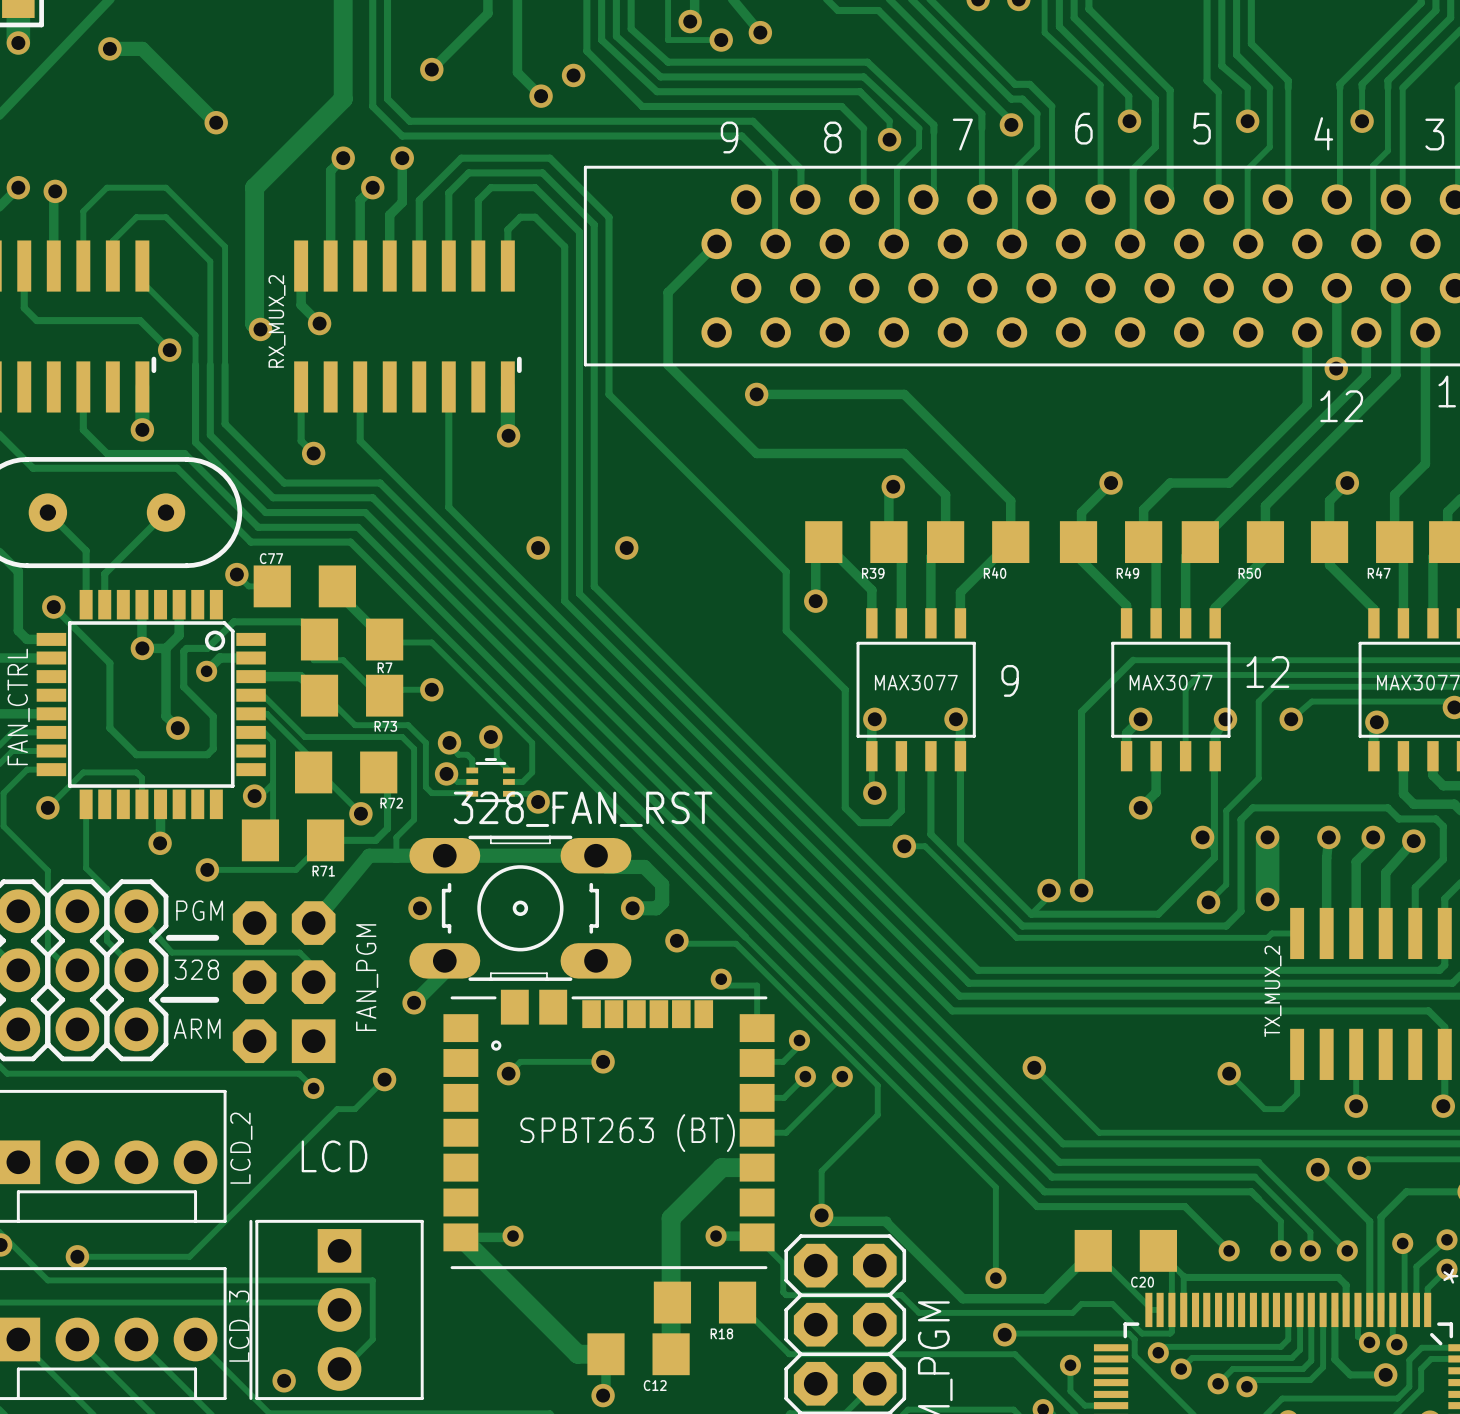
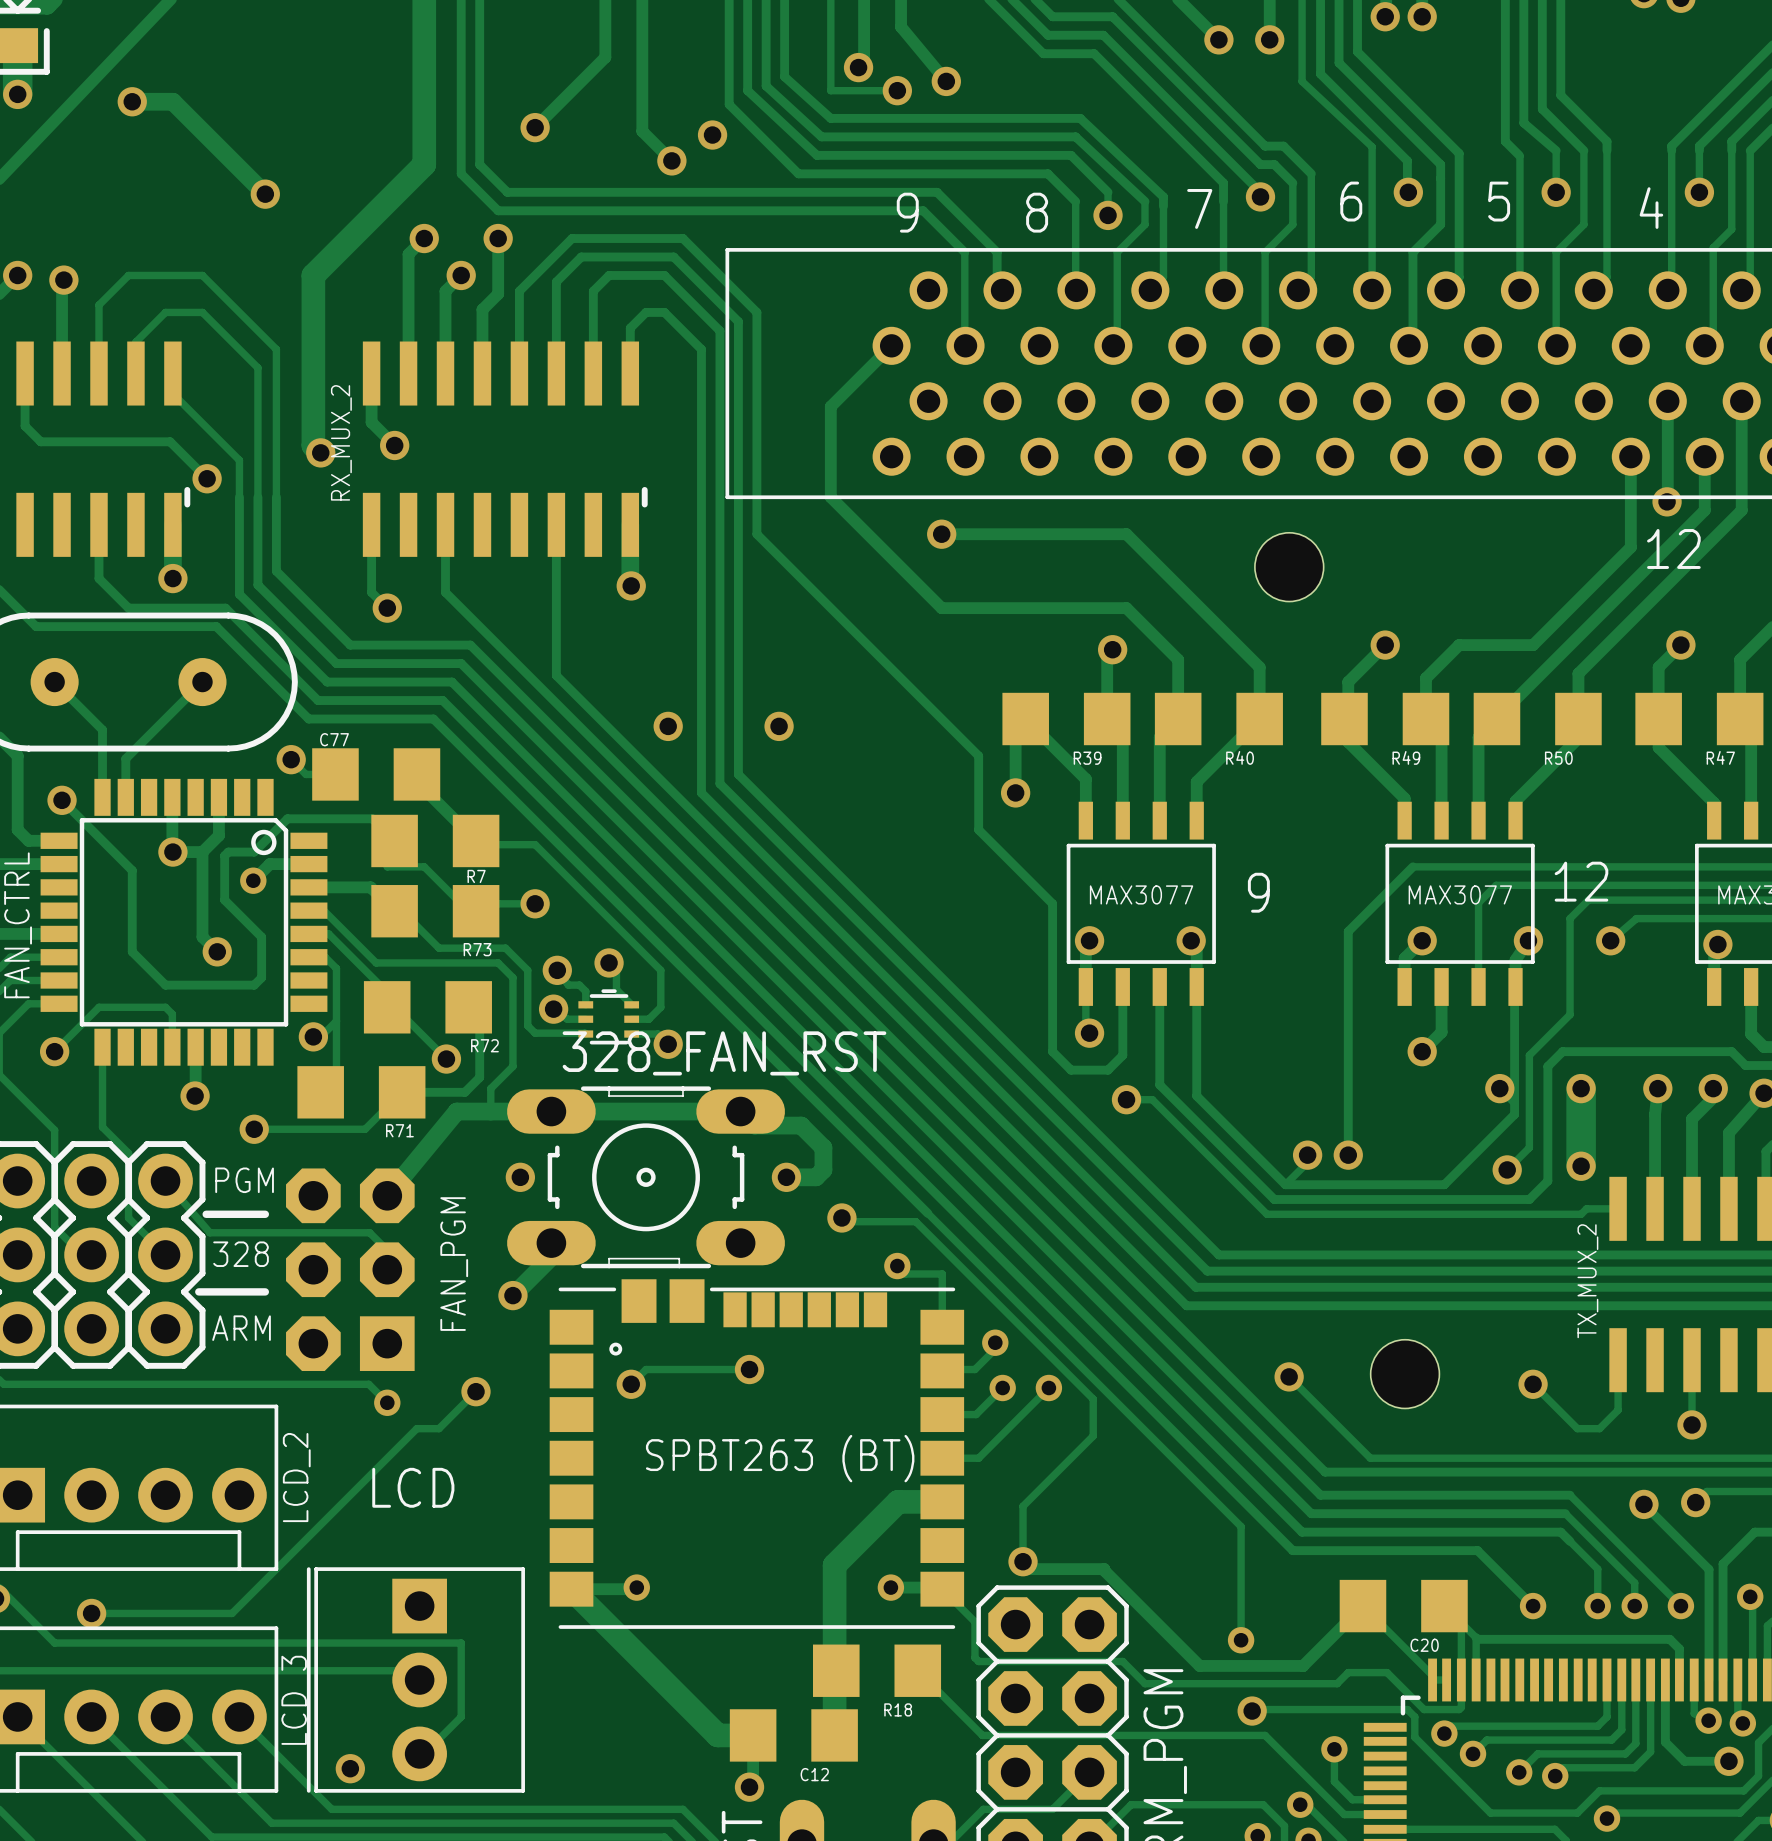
hole: none -> (1289, 567)
hole: none -> (1405, 1374)

